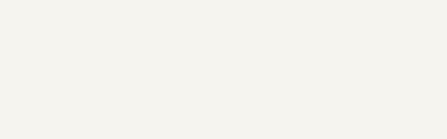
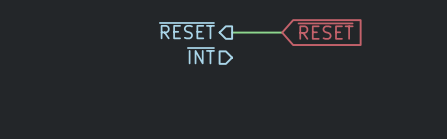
sheet pin: none -> ~{RESET} (186, 30)
global label: none -> ~{RESET} (325, 31)
wire: none -> (232, 32) (282, 32)
sheet pin: none -> ~{INT} (200, 55)

